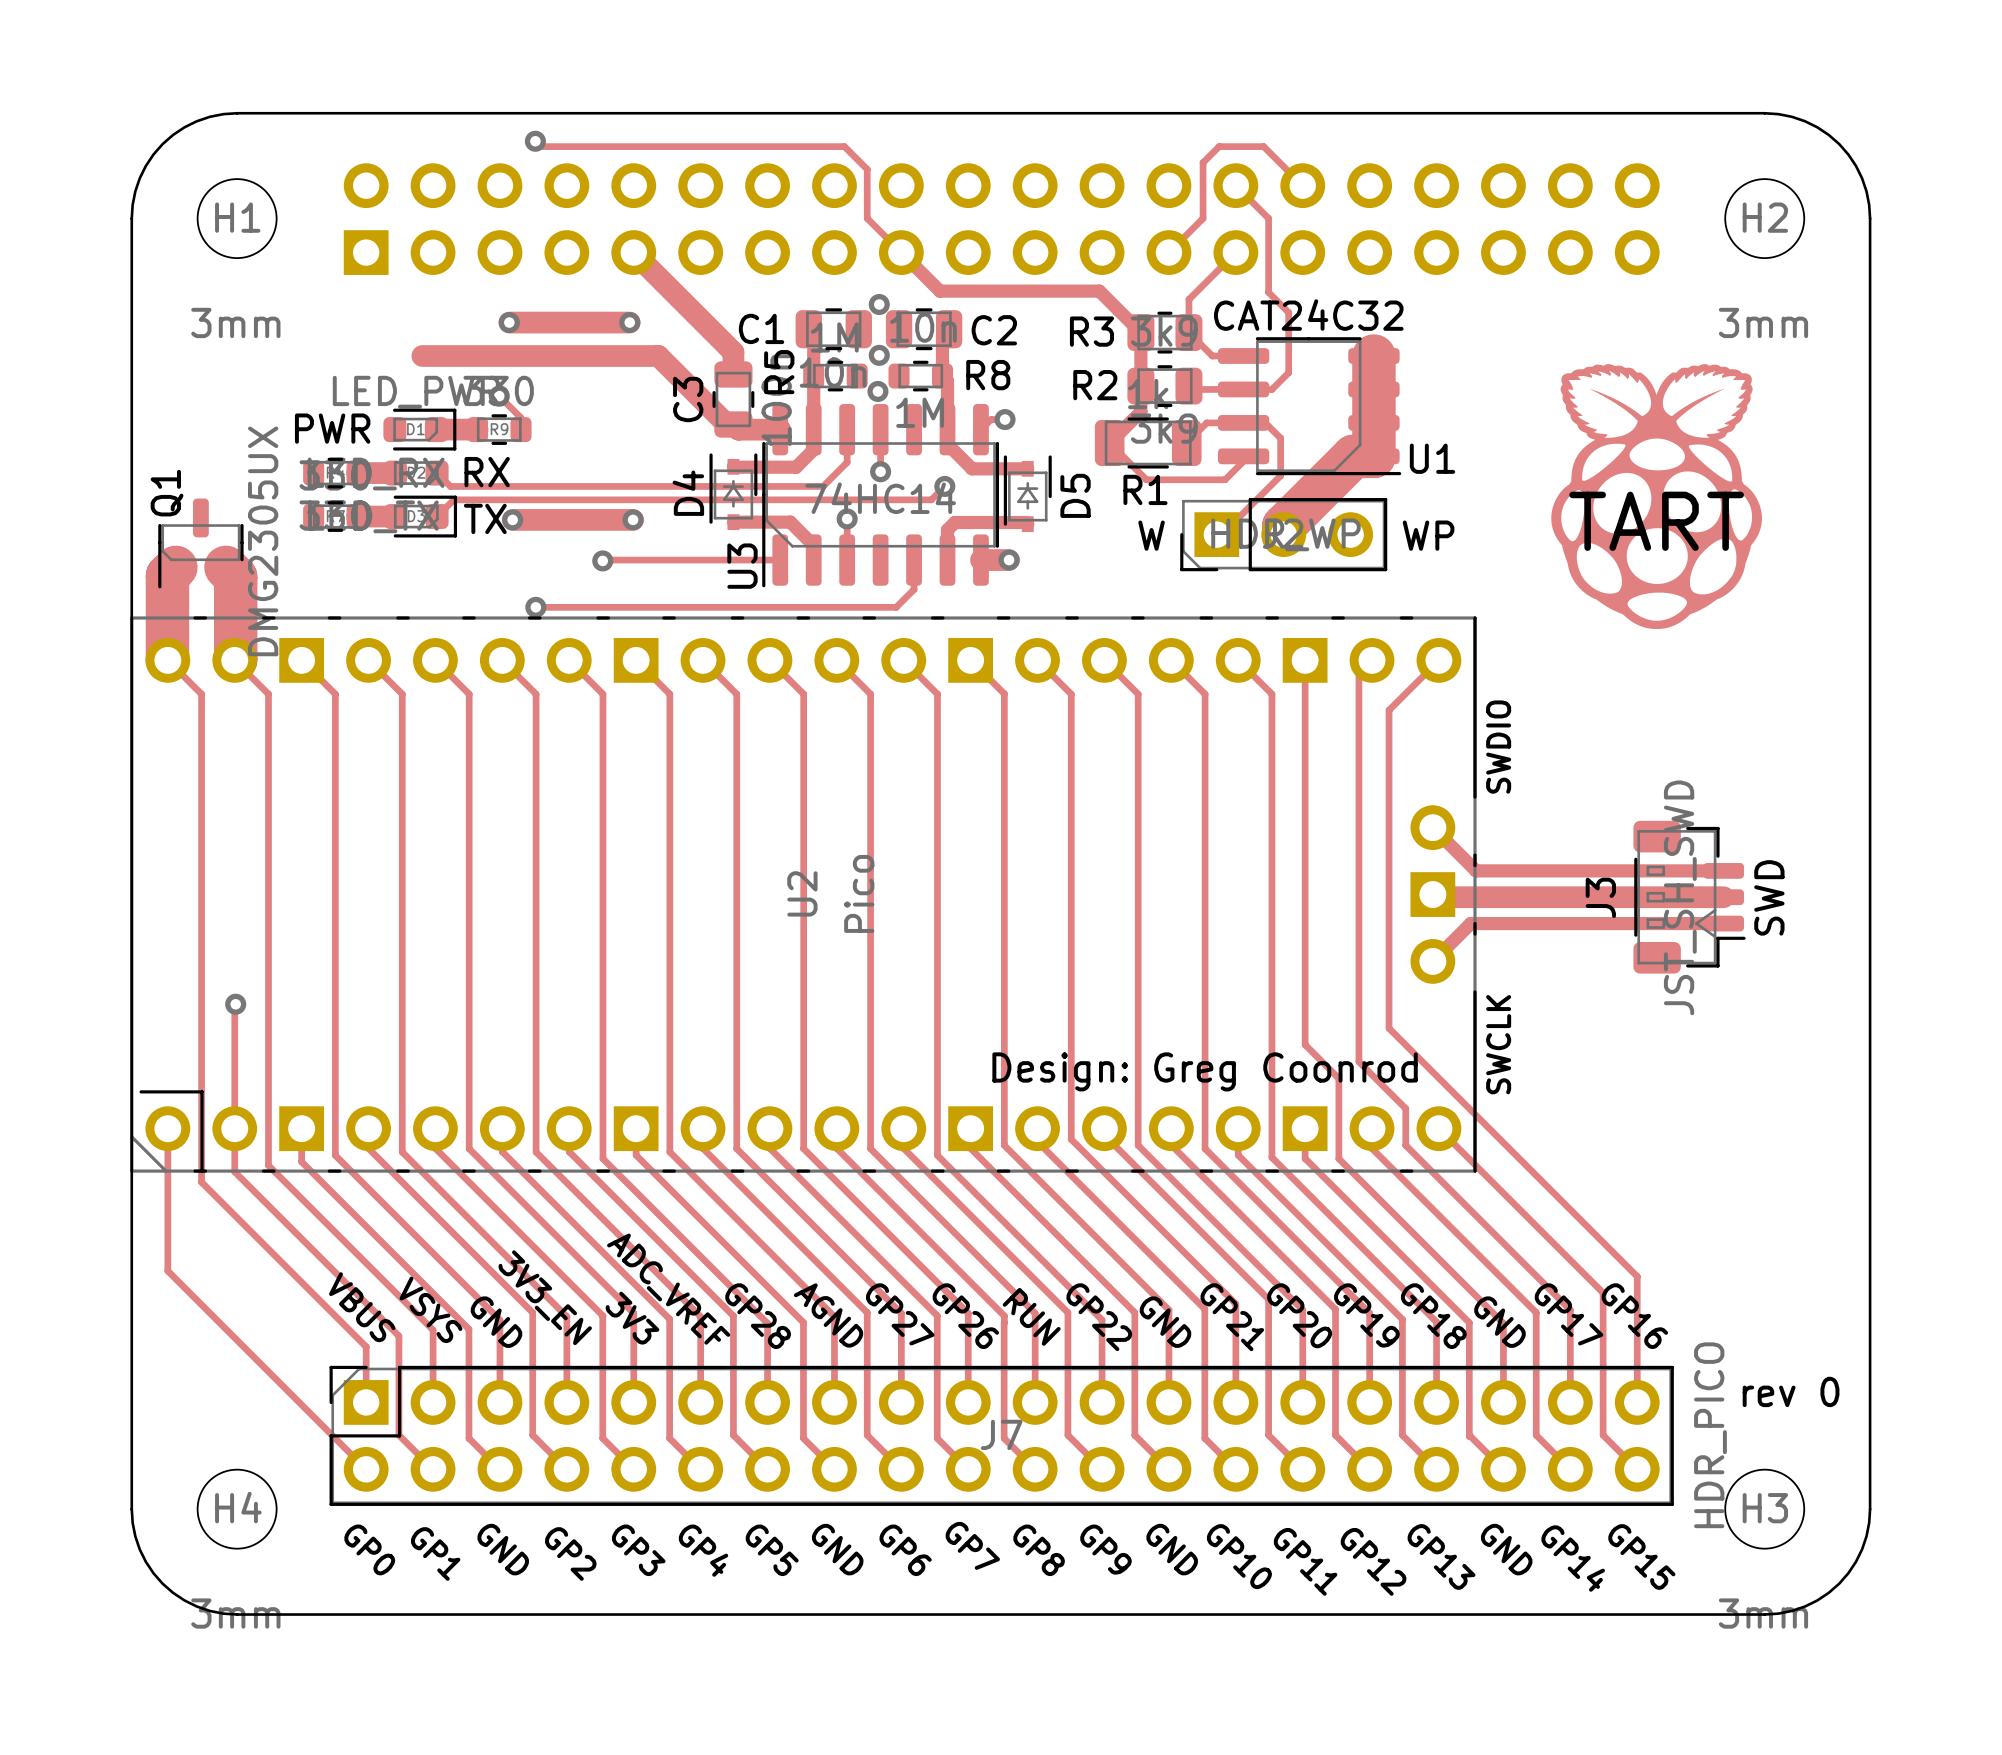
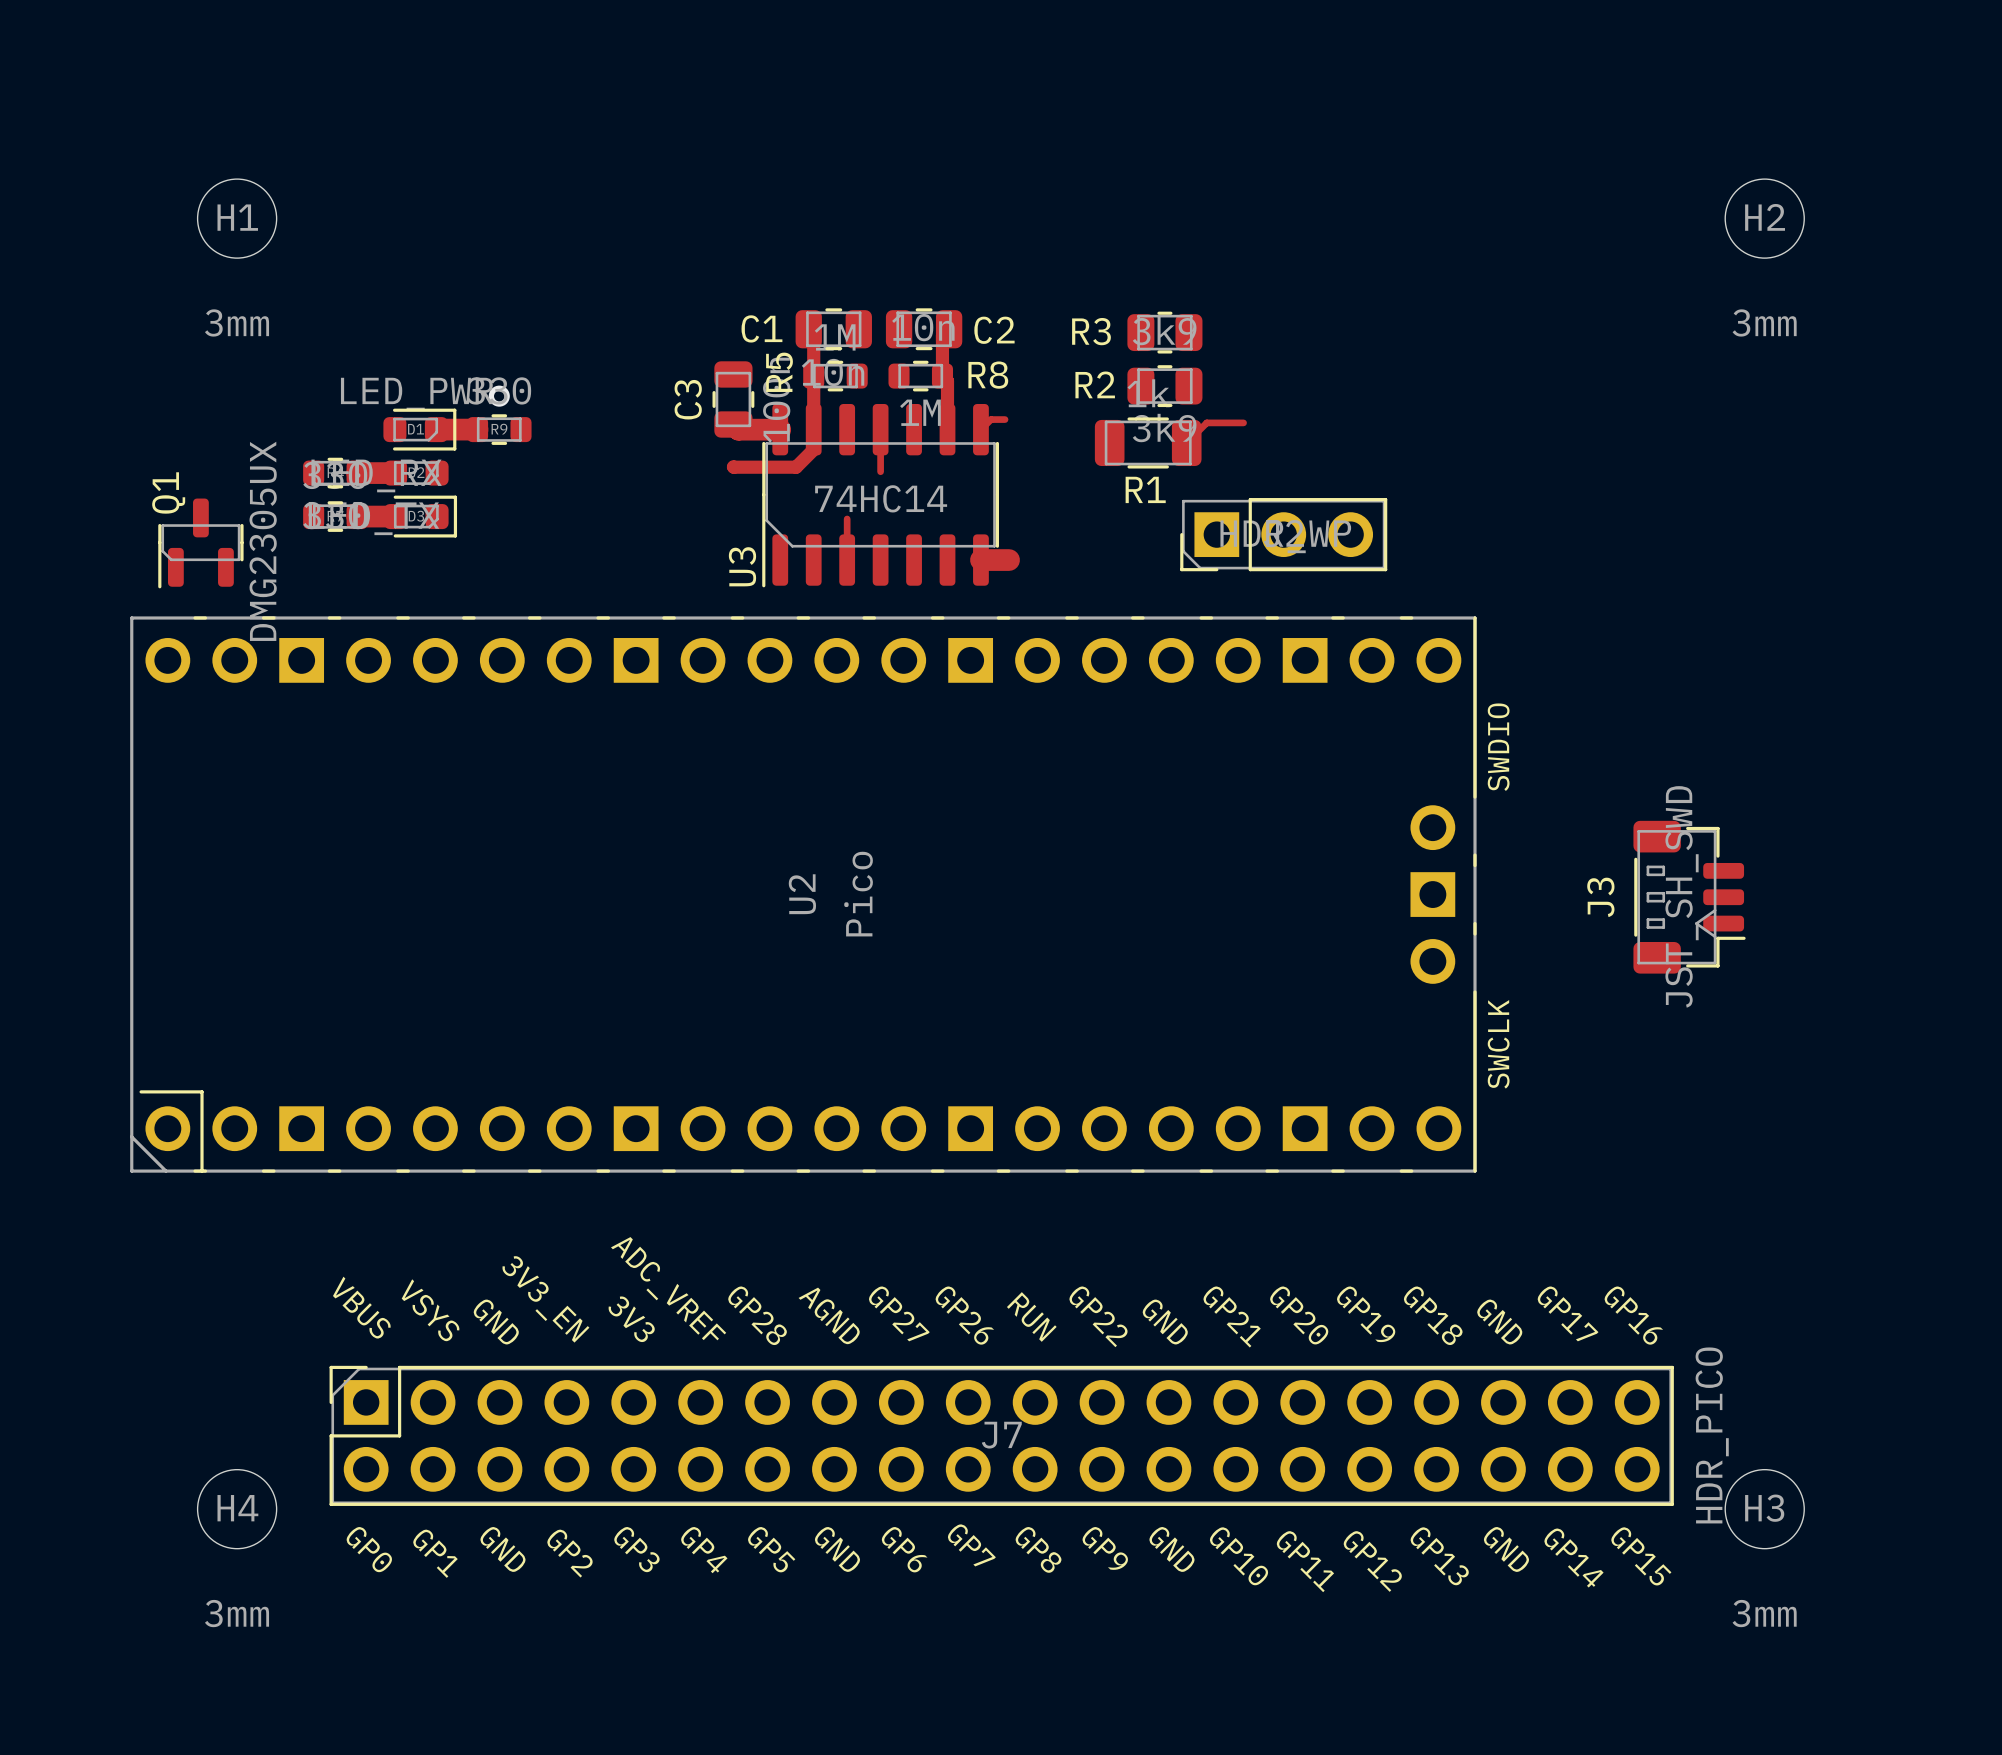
board edge: (237, 113) (1764, 113) (1778, 114) (1805, 121) (1828, 135) (1839, 144) (1855, 165) (1862, 178) (1869, 204) (1870, 218) (1870, 1509) (1866, 1536) (1862, 1549) (1855, 1561) (1839, 1583) (1817, 1600) (1805, 1606) (1791, 1610) (1764, 1614) (237, 1614) (223, 1613) (196, 1606) (184, 1600) (162, 1583) (145, 1561) (139, 1549) (135, 1536) (131, 1509) (131, 218) (132, 204) (139, 178) (153, 154) (162, 144) (184, 127) (196, 121) (209, 116) (237, 113) -> none
track: (535, 141) (540, 146) (844, 146) (867, 169) (867, 218) (939, 291) (1099, 291) (1140, 332) (1140, 411) (1109, 442) (1146, 479) (1225, 479) (1243, 461) (1243, 456) -> none
via: (535, 141) -> none
track: (1235, 185) (1268, 218) (1268, 292) (1288, 312) (1288, 372) (1271, 389) (1192, 389) -> none
track: (1302, 185) (1263, 146) (1219, 146) (1203, 162) (1203, 218) (1168, 252) -> none
part: (1001, 219) -> none
track: (633, 252) (733, 352) (733, 374) -> none
track: (1235, 252) (1188, 299) (1188, 332) (1212, 356) (1243, 356) -> none
via: (879, 304) -> none
track: (509, 322) (629, 322) -> none
via: (509, 322) -> none
via: (629, 322) -> none
via: (879, 355) -> none
track: (422, 356) (658, 356) (726, 424) -> none
track: (1373, 356) (1373, 456) (1353, 456) (1283, 526) (1283, 534) -> none
drawing: [1551, 364, 1762, 630] -> none
via: (877, 391) -> none
track: (499, 396) (521, 417) (521, 429) -> none
U1: CAT24C32 (1309, 406) -> none
via: (1005, 419) -> none
track: (1265, 422) (1280, 438) (1280, 475) (1221, 534) -> none
text: PWR (332, 428) -> none
track: (847, 429) (847, 462) (823, 486) (450, 486) (437, 473) -> none
track: (947, 444) (972, 468) (1027, 468) -> none
via: (880, 471) -> none
text: RX (487, 472) -> none
track: (944, 486) (931, 499) (453, 499) (437, 516) -> none
via: (944, 486) -> none
D4: (733, 491) -> none
D5: (1027, 493) -> none
text: TX (485, 518) -> none
via: (847, 518) -> none
track: (512, 519) (633, 519) -> none
via: (512, 519) -> none
via: (633, 519) -> none
text: TART (1656, 521) -> none
track: (733, 522) (790, 522) (813, 545) -> none
track: (1027, 524) (1026, 522) (954, 522) (947, 529) (947, 560) -> none
text: W (1151, 535) -> none
text: WP (1428, 535) -> none
via: (602, 560) -> none
track: (780, 560) (602, 560) -> none
track: (914, 560) (914, 589) (896, 607) (535, 607) -> none
via: (1009, 560) -> none
track: (175, 567) (167, 575) (167, 660) -> none
track: (225, 567) (235, 577) (234, 660) (268, 694) (268, 1165) (433, 1330) (433, 1402) -> none
via: (535, 607) -> none
track: (167, 660) (201, 694) (201, 1182) (366, 1346) (366, 1402) -> none
track: (301, 660) (335, 694) (335, 1155) (499, 1320) (499, 1402) -> none
track: (368, 660) (402, 694) (402, 1152) (566, 1316) (566, 1402) -> none
track: (435, 660) (469, 694) (469, 1148) (633, 1313) (633, 1402) -> none
track: (502, 660) (536, 694) (536, 1152) (700, 1316) (700, 1402) -> none
track: (569, 660) (602, 694) (602, 1158) (767, 1323) (767, 1402) -> none
track: (636, 660) (669, 694) (669, 1152) (834, 1316) (834, 1402) -> none
track: (703, 660) (736, 694) (736, 1148) (901, 1313) (901, 1402) -> none
track: (769, 660) (803, 694) (803, 1148) (968, 1313) (968, 1402) -> none
track: (836, 660) (870, 694) (870, 1148) (1035, 1313) (1035, 1402) -> none
track: (903, 660) (937, 694) (937, 1155) (1102, 1320) (1102, 1402) -> none
track: (970, 660) (1004, 693) (1004, 1145) (1168, 1310) (1168, 1402) -> none
track: (1037, 660) (1071, 694) (1071, 1139) (1235, 1303) (1235, 1402) -> none
track: (1104, 660) (1138, 694) (1138, 1145) (1302, 1310) (1302, 1402) -> none
track: (1171, 660) (1205, 694) (1205, 1148) (1369, 1313) (1369, 1402) -> none
track: (1238, 660) (1271, 694) (1271, 1157) (1436, 1322) (1436, 1402) -> none
track: (1305, 660) (1305, 1044) (1338, 1078) (1338, 1158) (1503, 1323) (1503, 1402) -> none
track: (1438, 660) (1389, 710) (1389, 1028) (1637, 1276) (1637, 1402) -> none
track: (1358, 673) (1358, 1061) (1405, 1108) (1405, 1145) (1570, 1310) (1570, 1402) -> none
track: (1432, 827) (1476, 870) (1723, 870) -> none
track: (1435, 897) (1723, 897) -> none
text: SWD (1769, 897) -> none
track: (1723, 923) (1470, 923) (1432, 961) -> none
track: (235, 1004) (234, 1171) (398, 1336) (398, 1435) (433, 1469) -> none
via: (235, 1004) -> none
text: Design: Greg Coonrod (1205, 1071) -> none
track: (167, 1128) (167, 1271) (366, 1469) -> none
track: (301, 1128) (301, 1161) (468, 1329) (468, 1438) (499, 1469) -> none
track: (368, 1128) (368, 1148) (532, 1312) (532, 1435) (566, 1469) -> none
track: (435, 1128) (435, 1148) (602, 1316) -> none
track: (502, 1128) (502, 1151) (669, 1319) (669, 1438) (700, 1469) -> none
track: (569, 1128) (569, 1151) (733, 1316) (733, 1435) (767, 1469) -> none
track: (636, 1128) (636, 1155) (803, 1322) (803, 1438) (834, 1469) -> none
track: (703, 1128) (703, 1148) (867, 1312) (867, 1435) (901, 1469) -> none
track: (769, 1128) (769, 1148) (937, 1315) (937, 1438) (968, 1469) -> none
track: (836, 1128) (836, 1148) (1004, 1316) (1004, 1322) -> none
track: (903, 1128) (903, 1148) (1067, 1312) (1067, 1435) (1102, 1469) -> none
track: (970, 1128) (970, 1148) (1134, 1312) (1134, 1435) (1168, 1469) -> none
track: (1238, 1128) (1238, 1155) (1402, 1319) (1402, 1435) (1436, 1469) -> none
track: (1305, 1128) (1305, 1158) (1469, 1322) (1469, 1436) (1503, 1469) -> none
track: (1372, 1128) (1372, 1148) (1536, 1312) (1536, 1435) (1570, 1469) -> none
track: (1438, 1128) (1602, 1292) -> none
track: (1104, 1135) (1268, 1299) (1268, 1435) (1302, 1469) -> none
track: (1037, 1141) (1204, 1309) (1204, 1438) (1235, 1469) -> none
track: (1171, 1145) (1335, 1309) (1335, 1435) (1369, 1469) -> none
track: (1603, 1292) (1603, 1435) (1637, 1469) -> none
track: (602, 1316) (602, 1438) (633, 1469) -> none
track: (1004, 1322) (1004, 1438) (1035, 1469) -> none
text: rev 0 (1791, 1391) -> none

